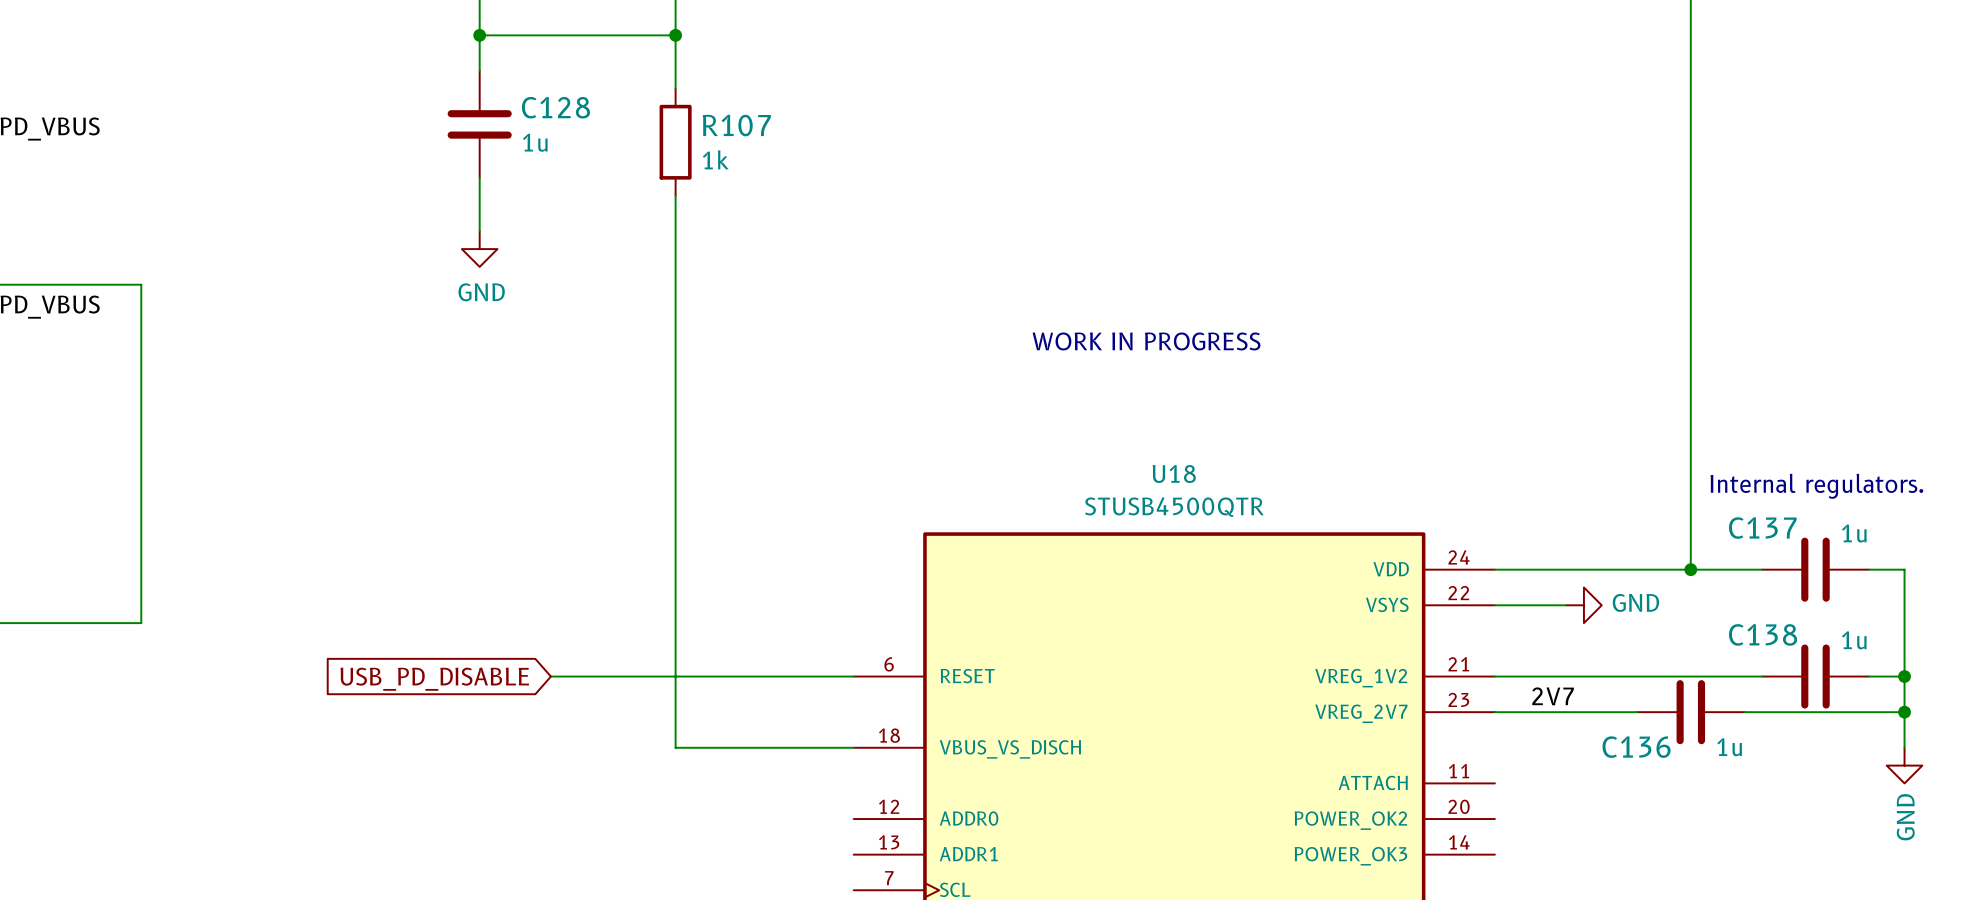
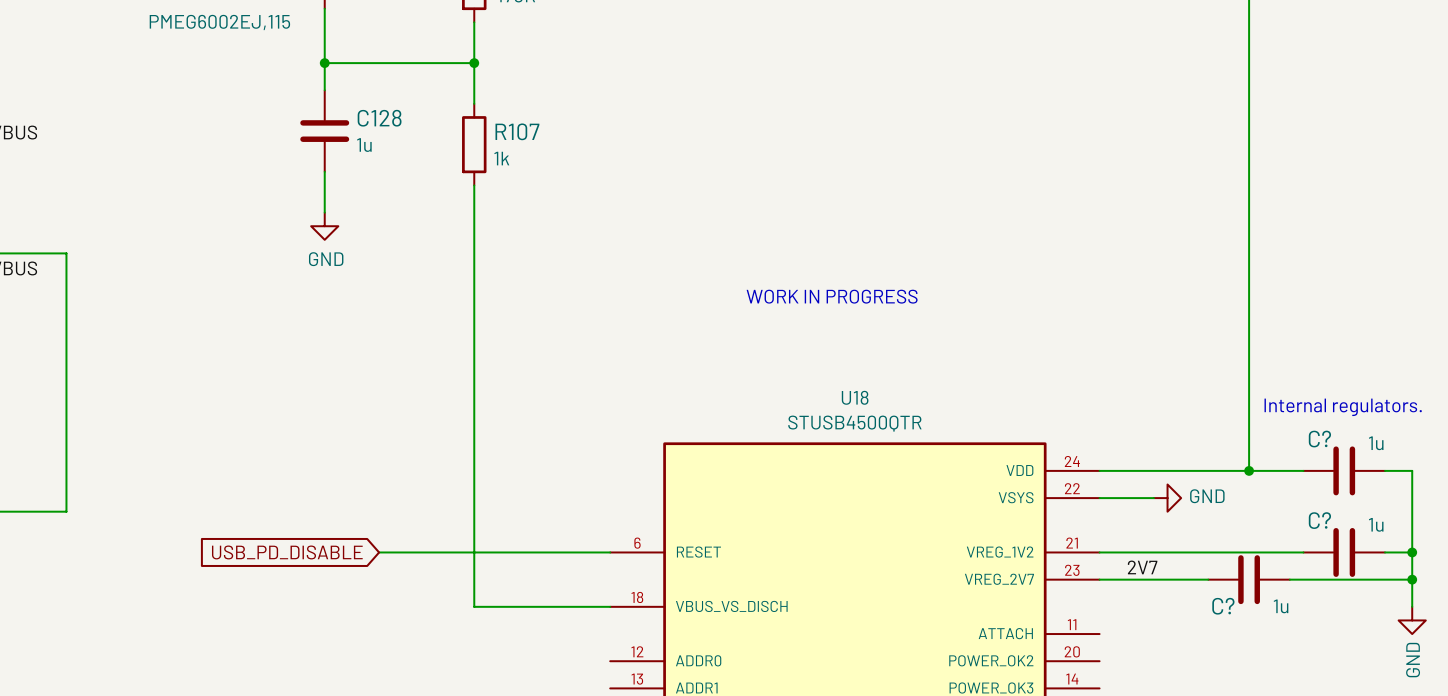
C137 name: C137 (1762, 528) -> C? (1319, 439)
C138 name: C138 (1763, 634) -> C? (1319, 520)
C136 name: C136 (1636, 747) -> C? (1223, 606)

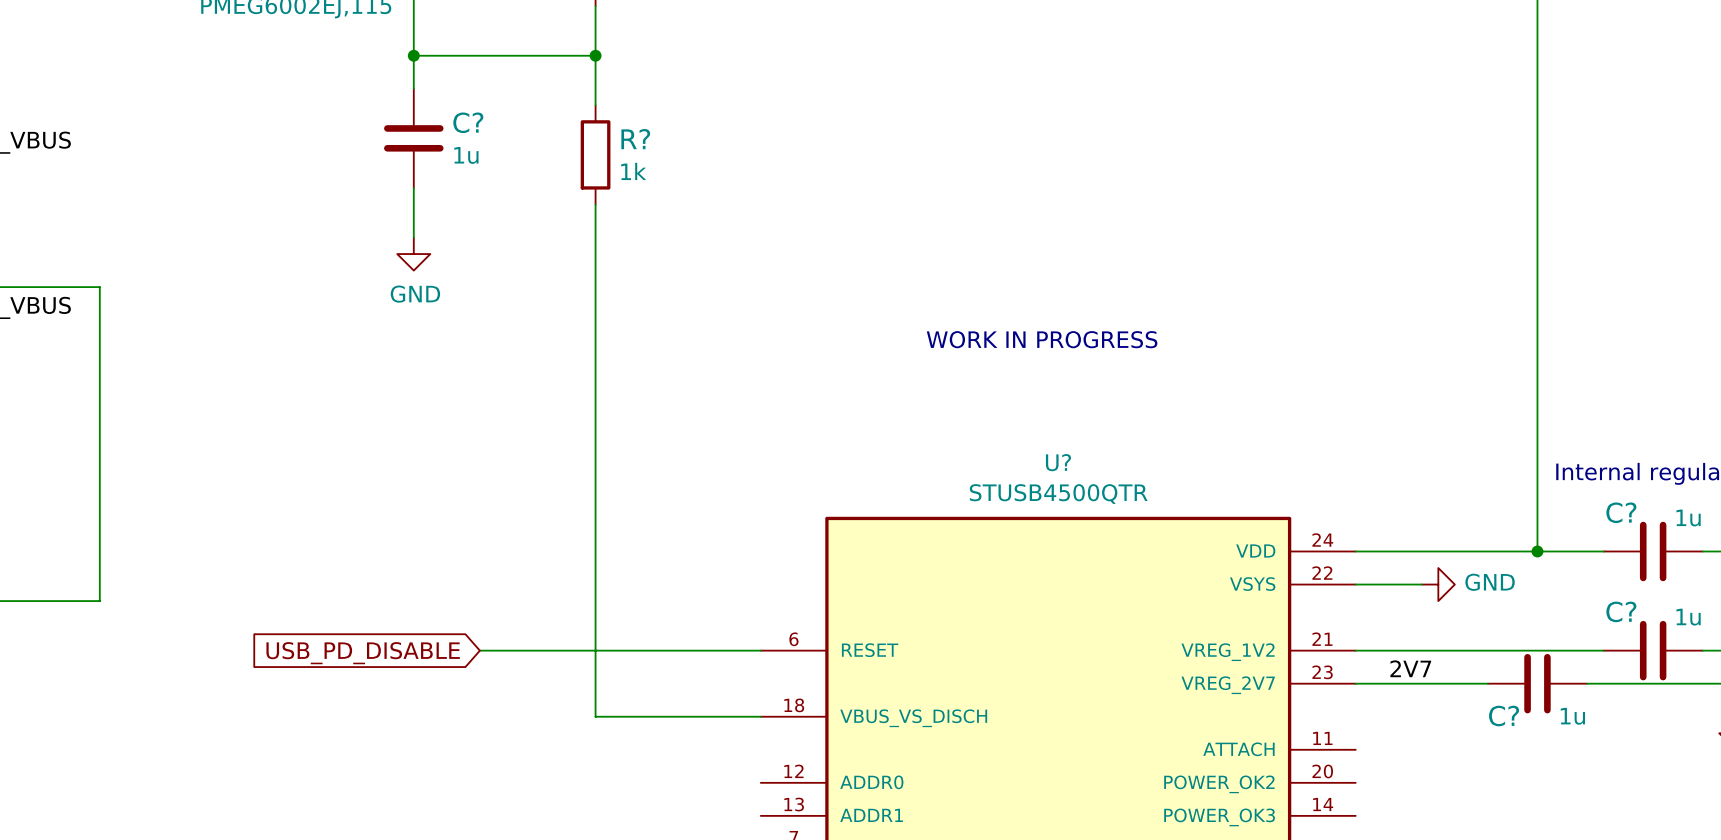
C128 name: C128 (379, 118) -> C? (468, 122)
R107 name: R107 (517, 131) -> R? (635, 139)
U18 name: U18 (855, 397) -> U? (1058, 462)

